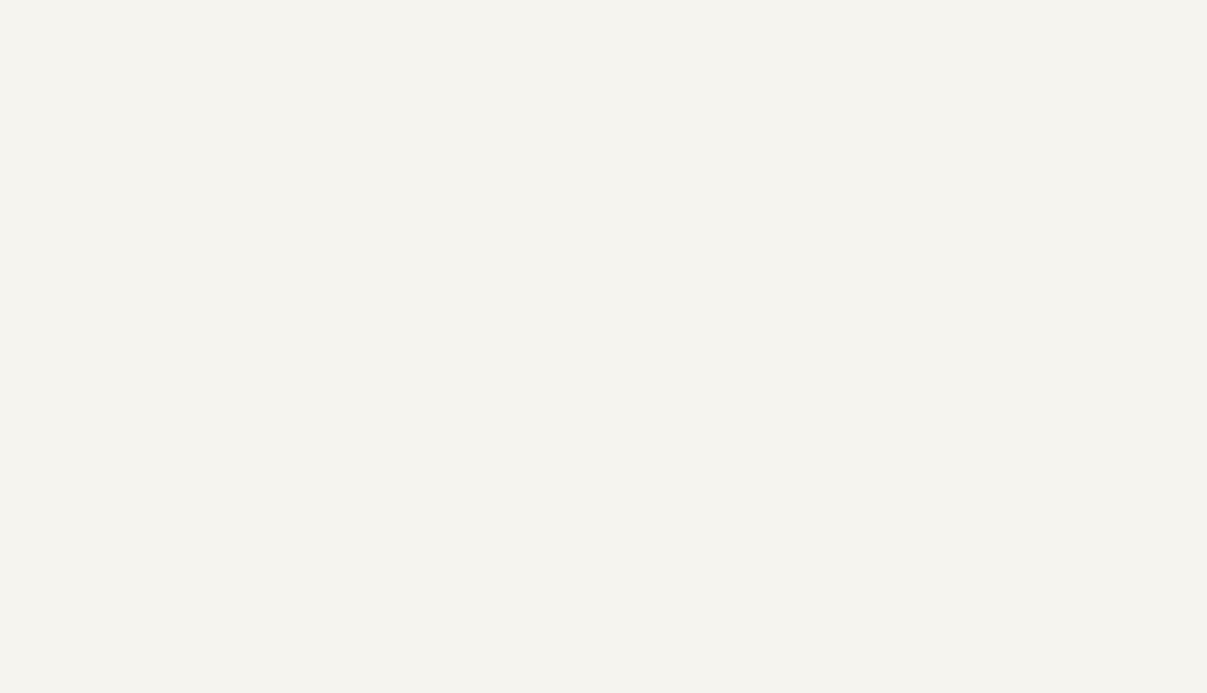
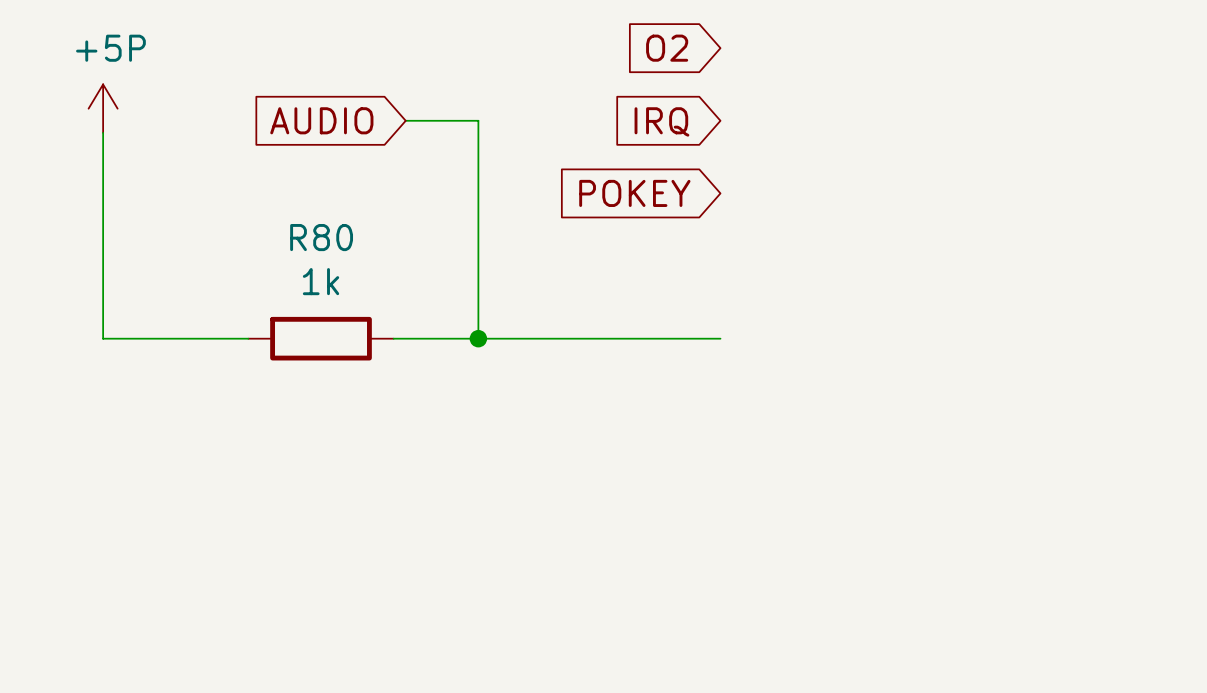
global label: none -> O2 (667, 48)
power symbol: none -> +5P (103, 108)
global label: none -> AUDIO (321, 120)
wire: none -> (405, 120) (478, 120) (478, 338)
global label: none -> IRQ (661, 121)
wire: none -> (103, 132) (103, 338) (248, 338)
global label: none -> POKEY (634, 193)
R80: none -> 1k (321, 338)
wire: none -> (393, 338) (720, 338)
junction: none -> (478, 338)

